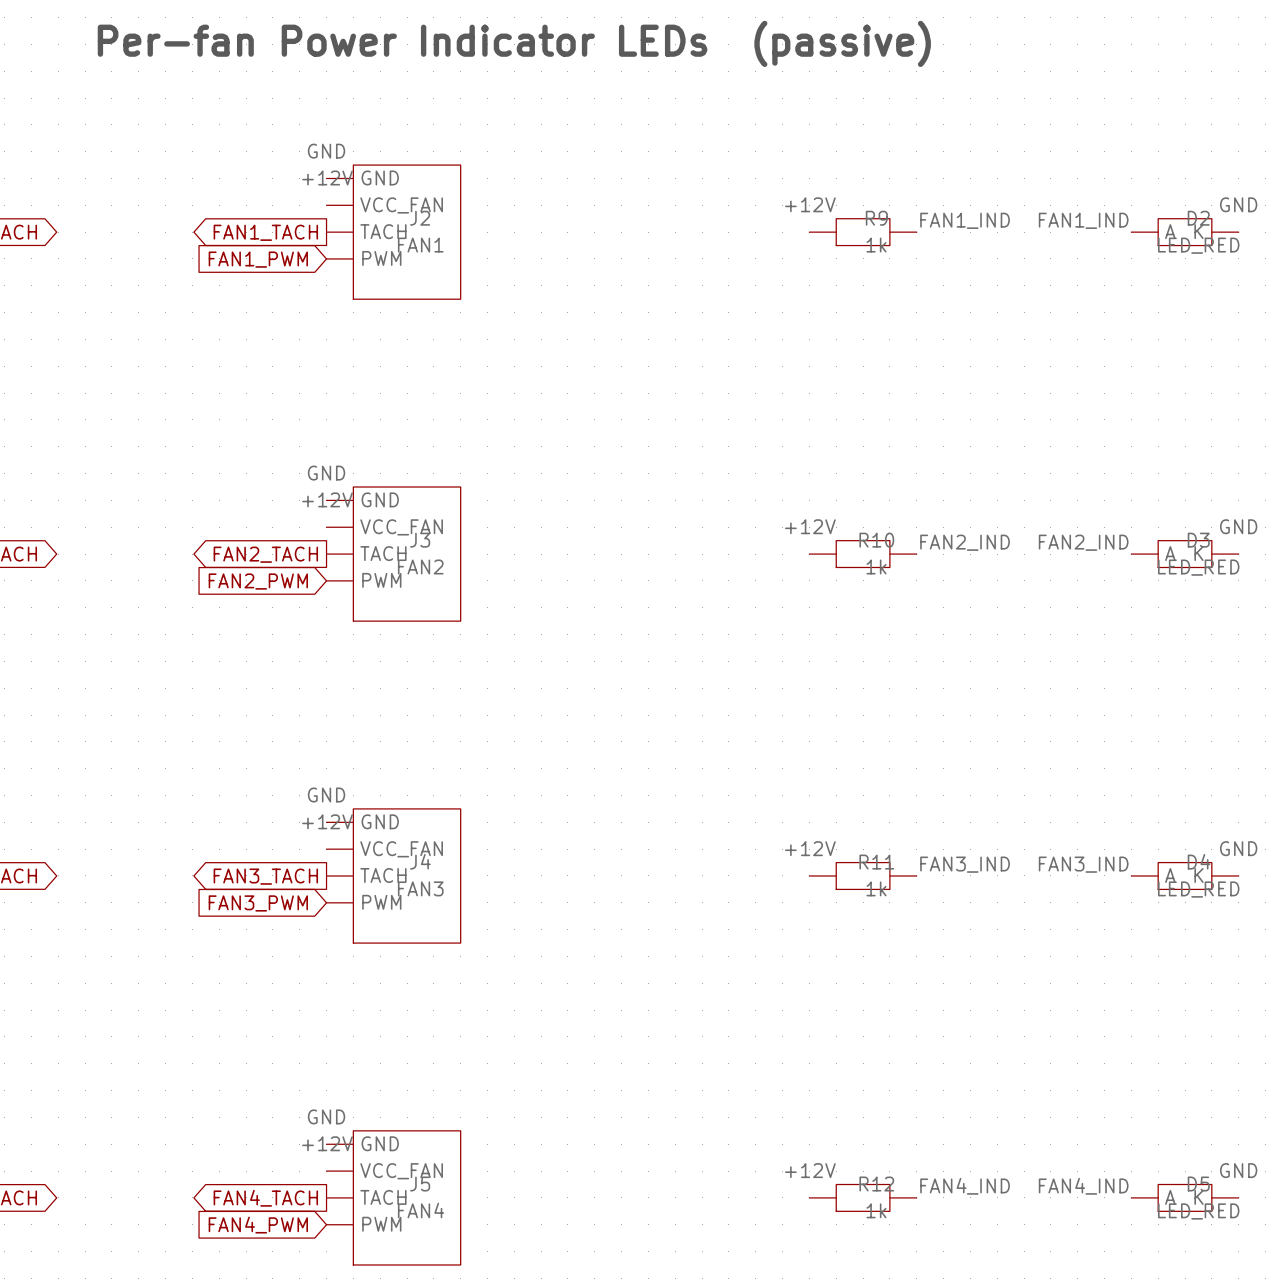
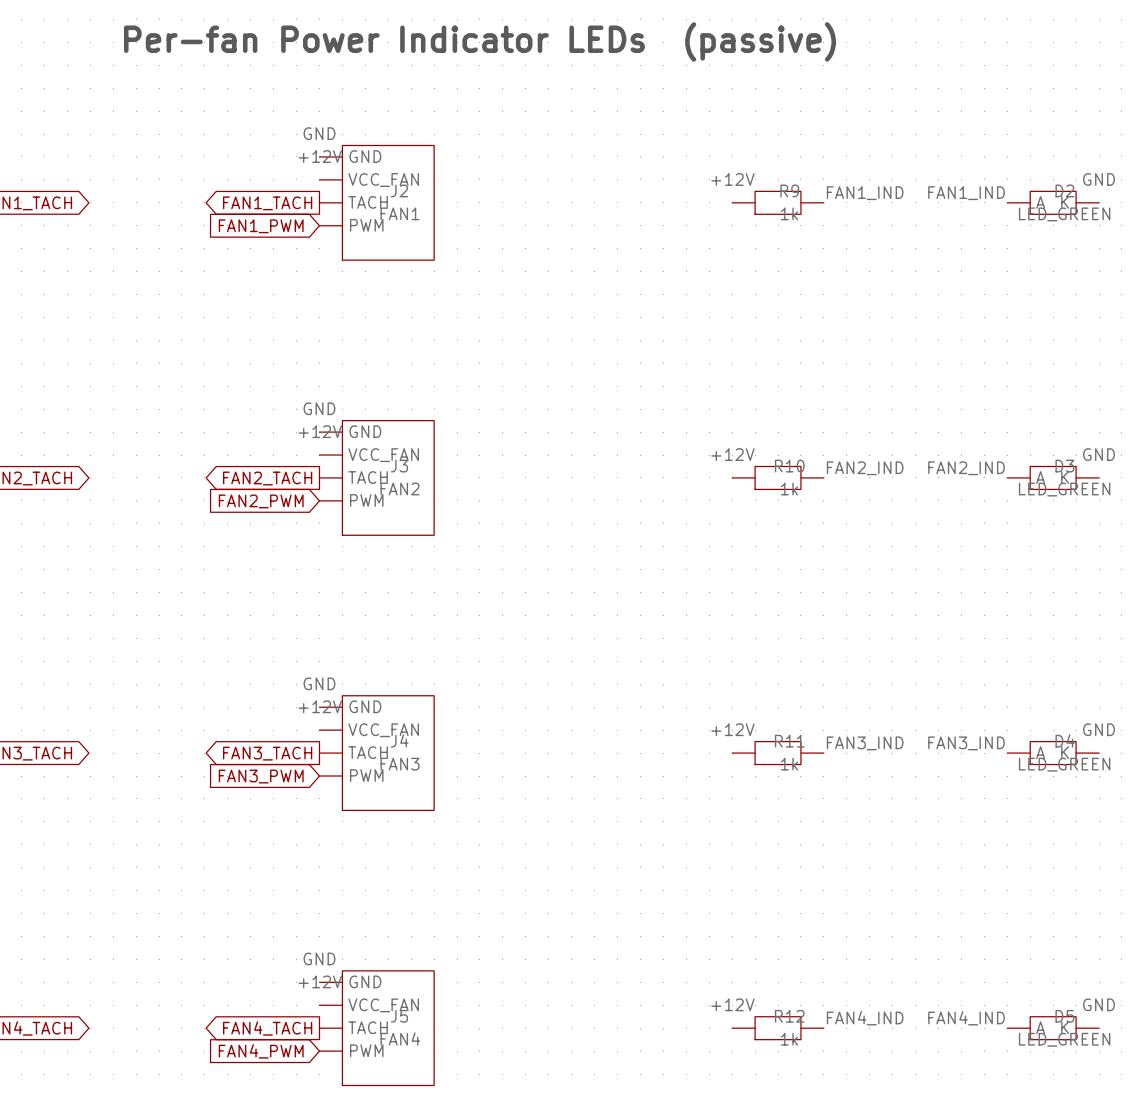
D2 value: LED_RED (1198, 245) -> LED_GREEN (1064, 214)
D3 value: LED_RED (1198, 567) -> LED_GREEN (1064, 489)
D4 value: LED_RED (1198, 889) -> LED_GREEN (1064, 764)
D5 value: LED_RED (1198, 1211) -> LED_GREEN (1064, 1039)

